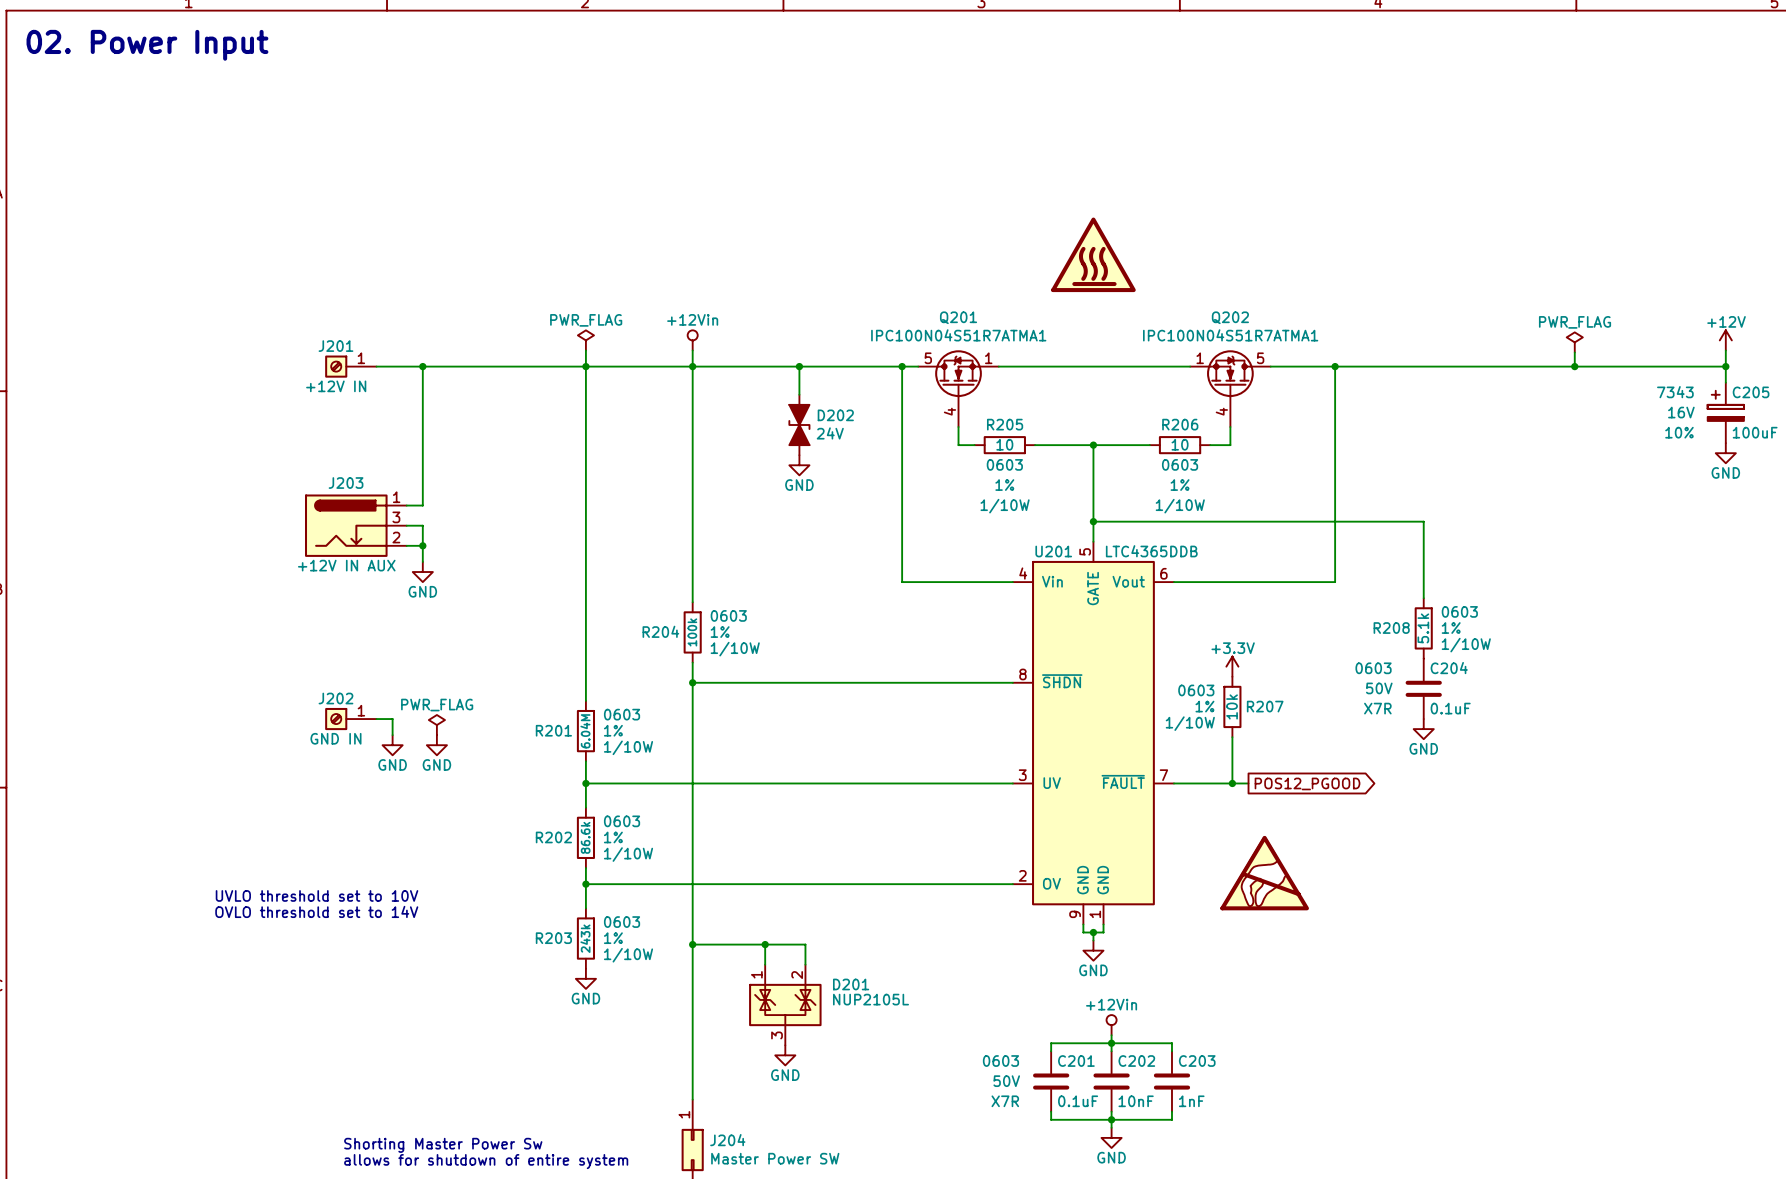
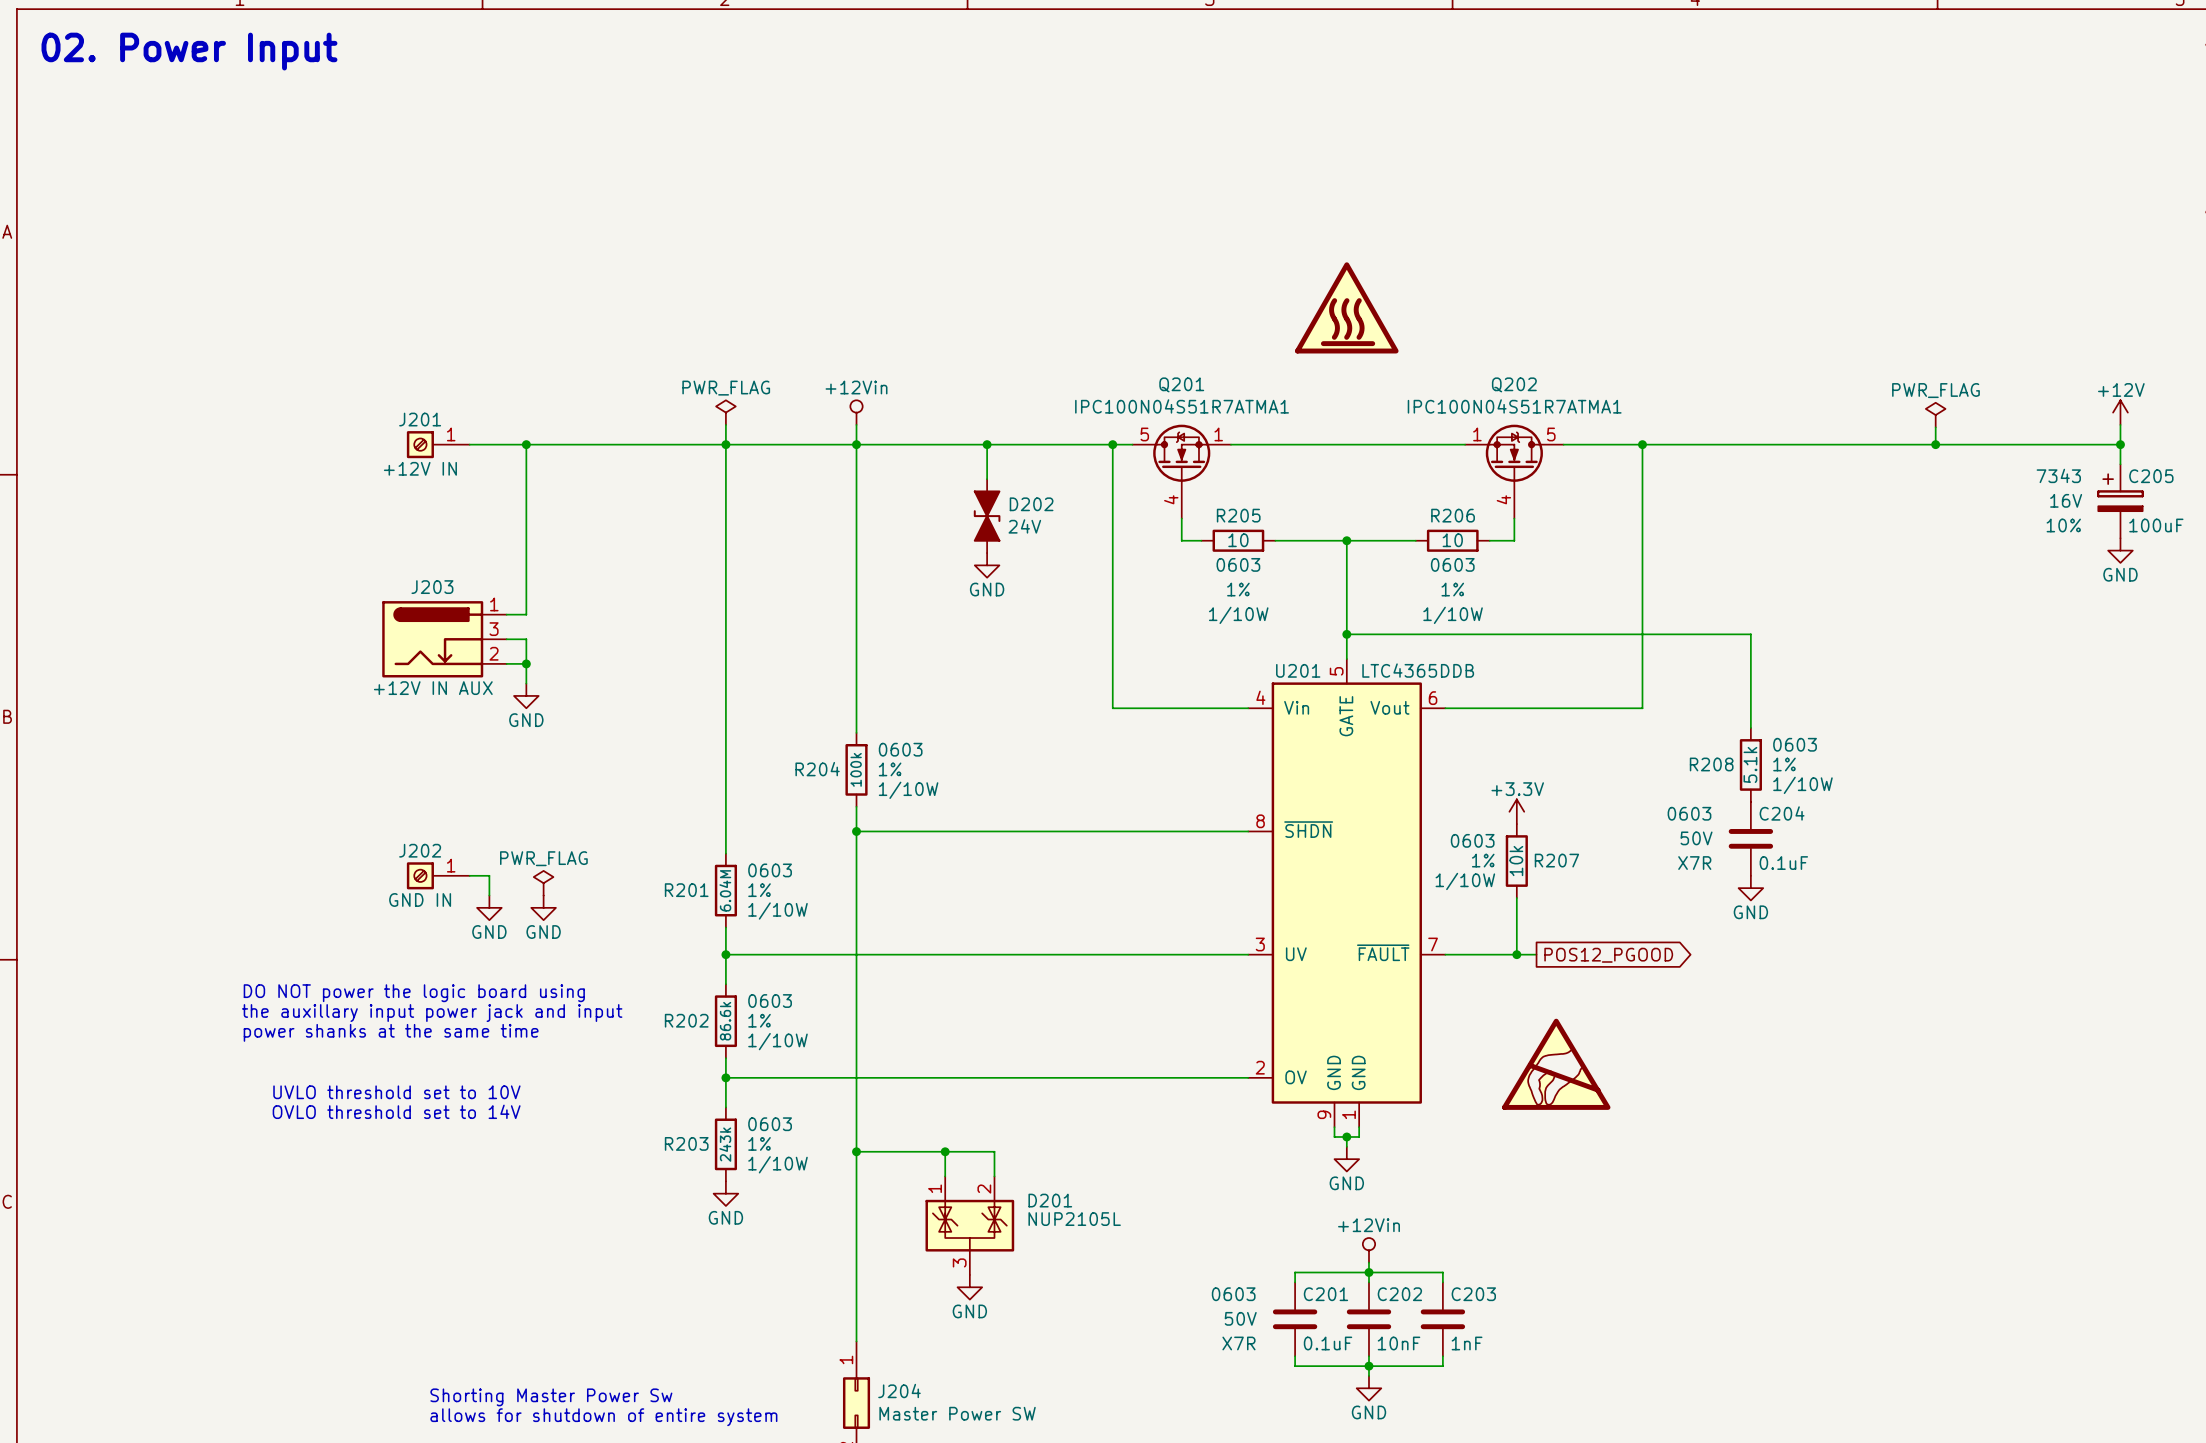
text: none -> DO NOT power the logic board using (414, 993)
text: none -> the auxillary input power jack and input (432, 1013)
text: none -> power shanks at the same time (391, 1032)

